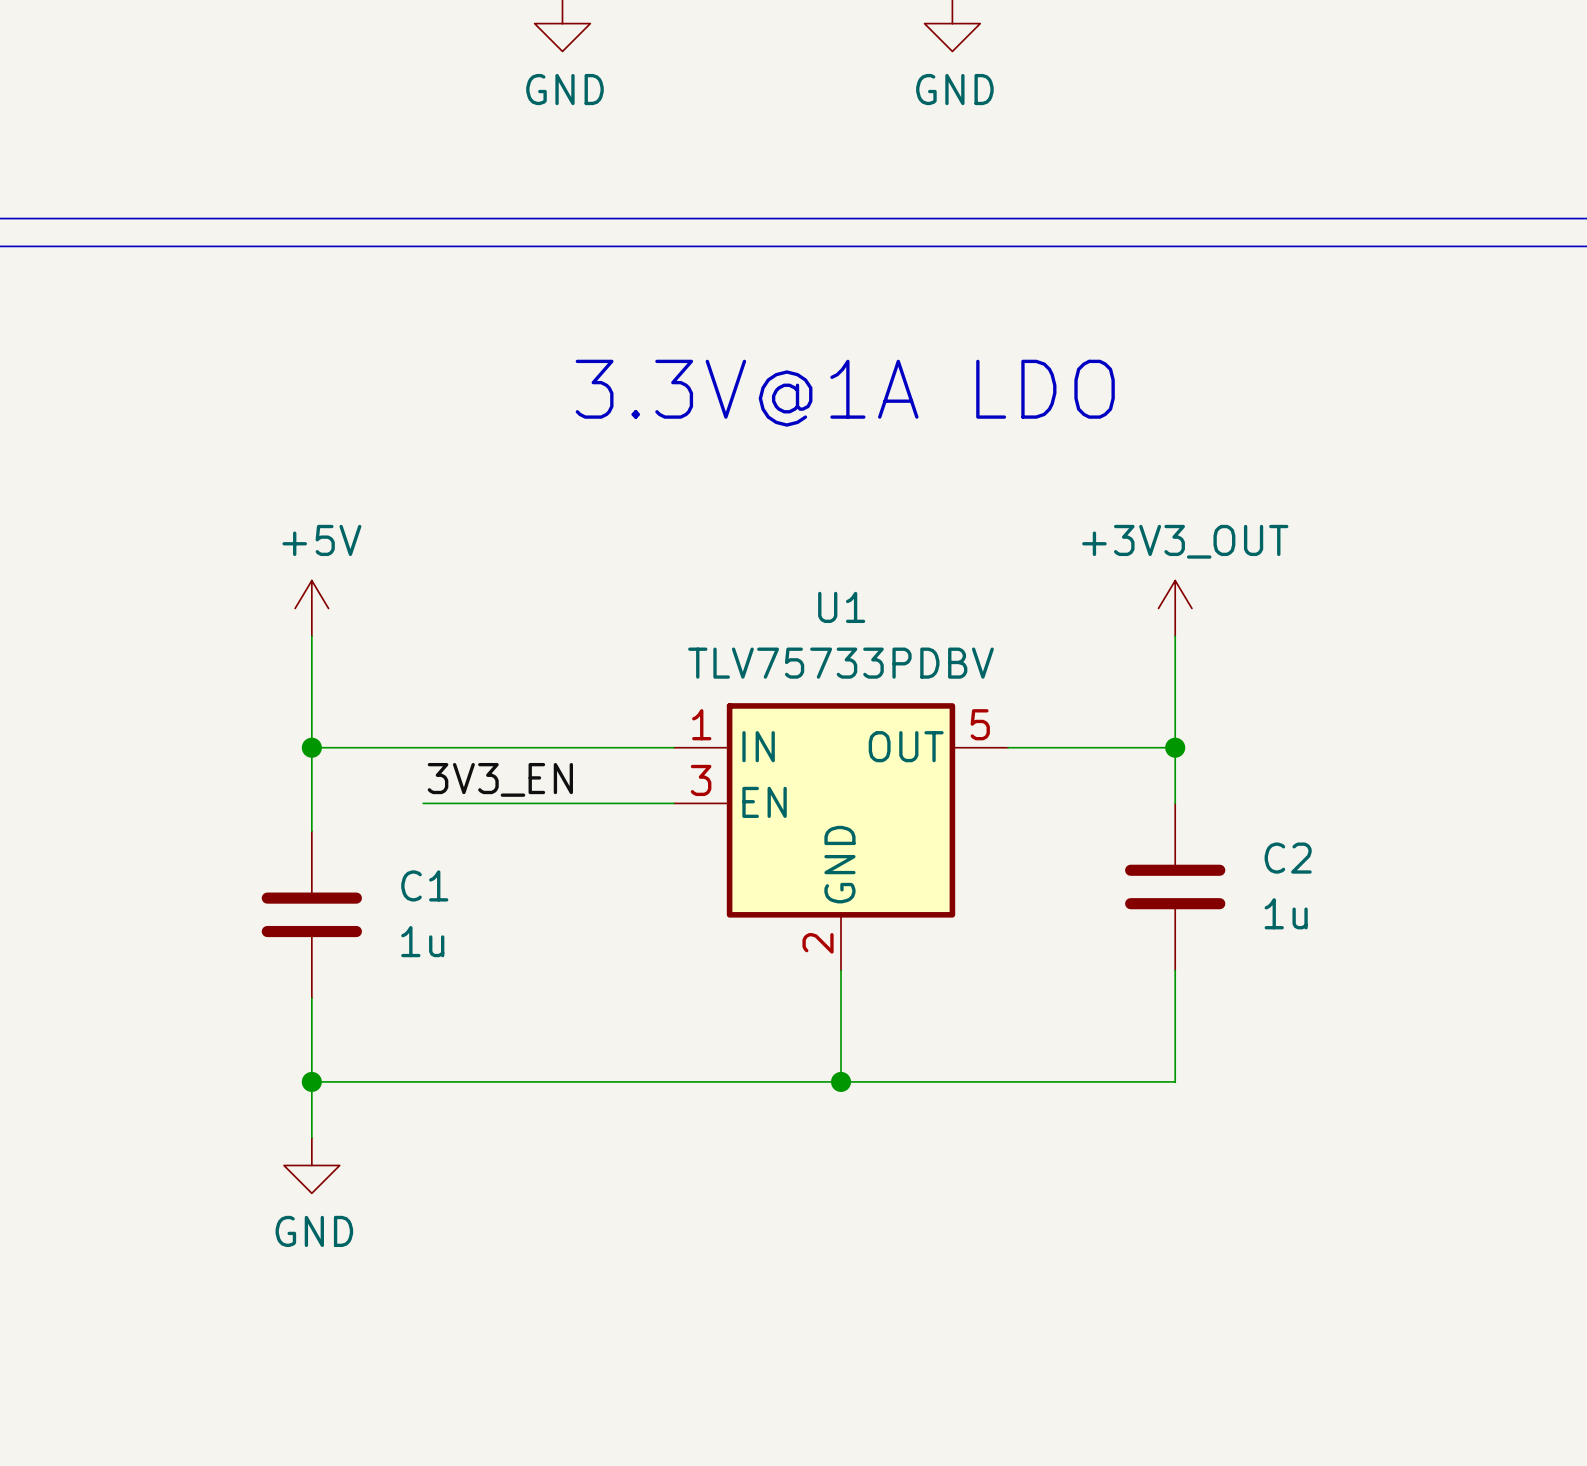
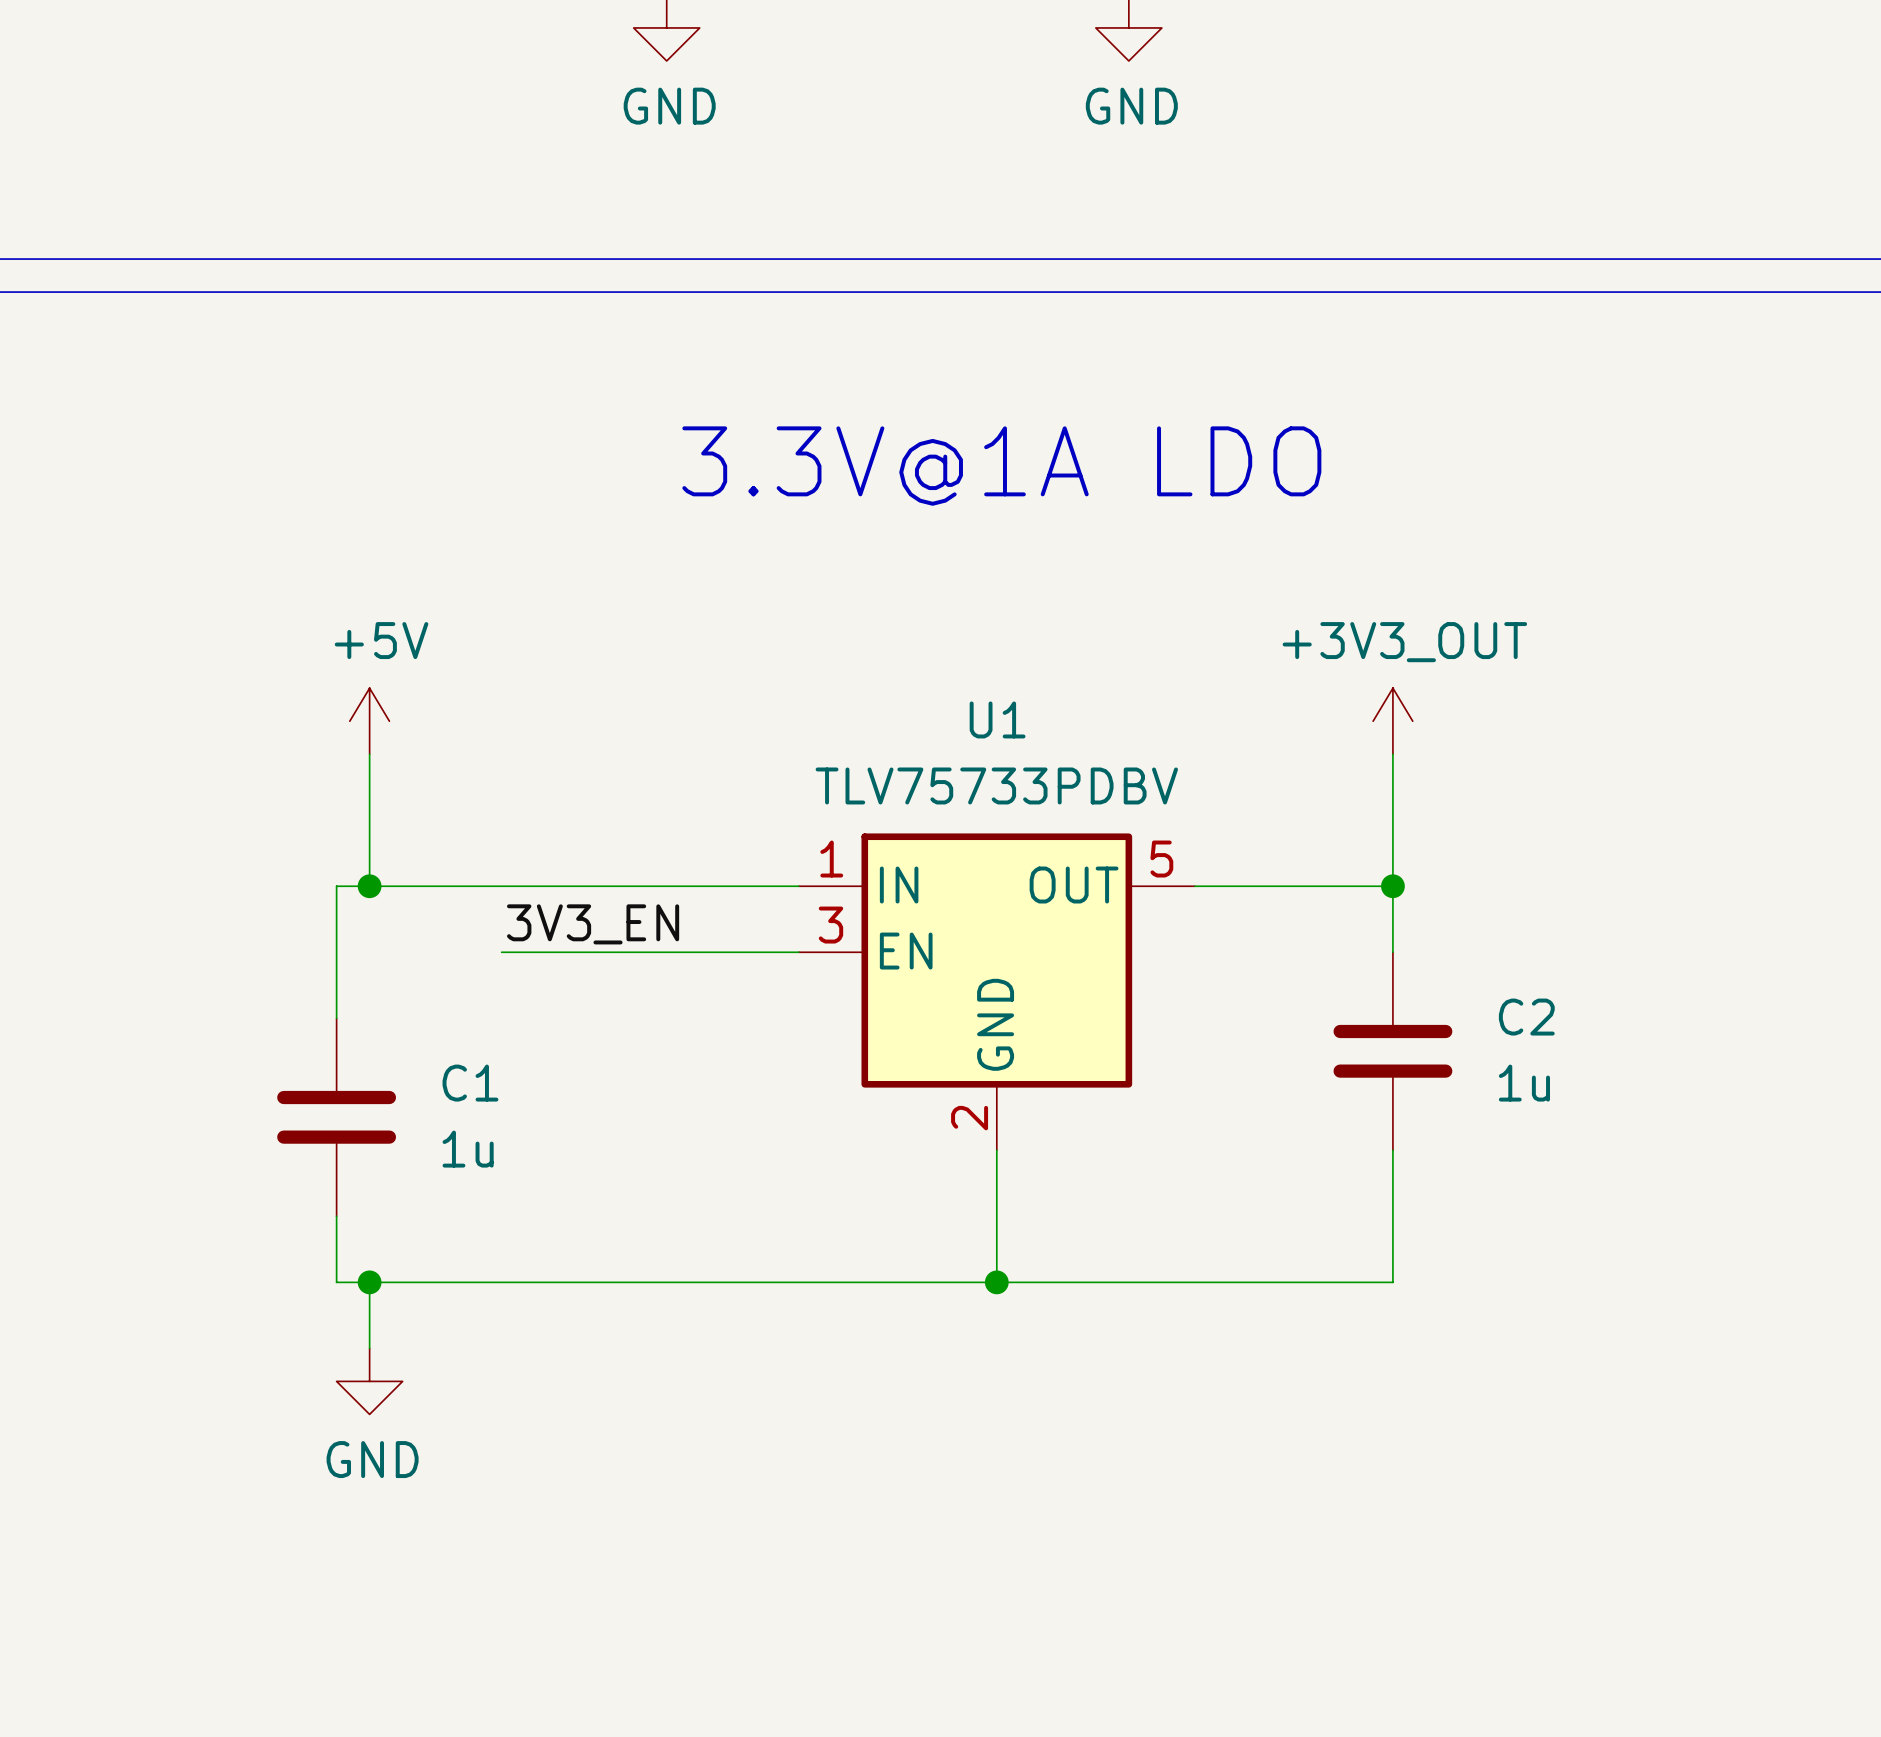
wire: (311, 747) (311, 831) -> (369, 886) (336, 886) (336, 1018)
C1 position: (311, 914) -> (336, 1117)
wire: (311, 998) (311, 1081) -> (336, 1216) (336, 1282) (369, 1282)

